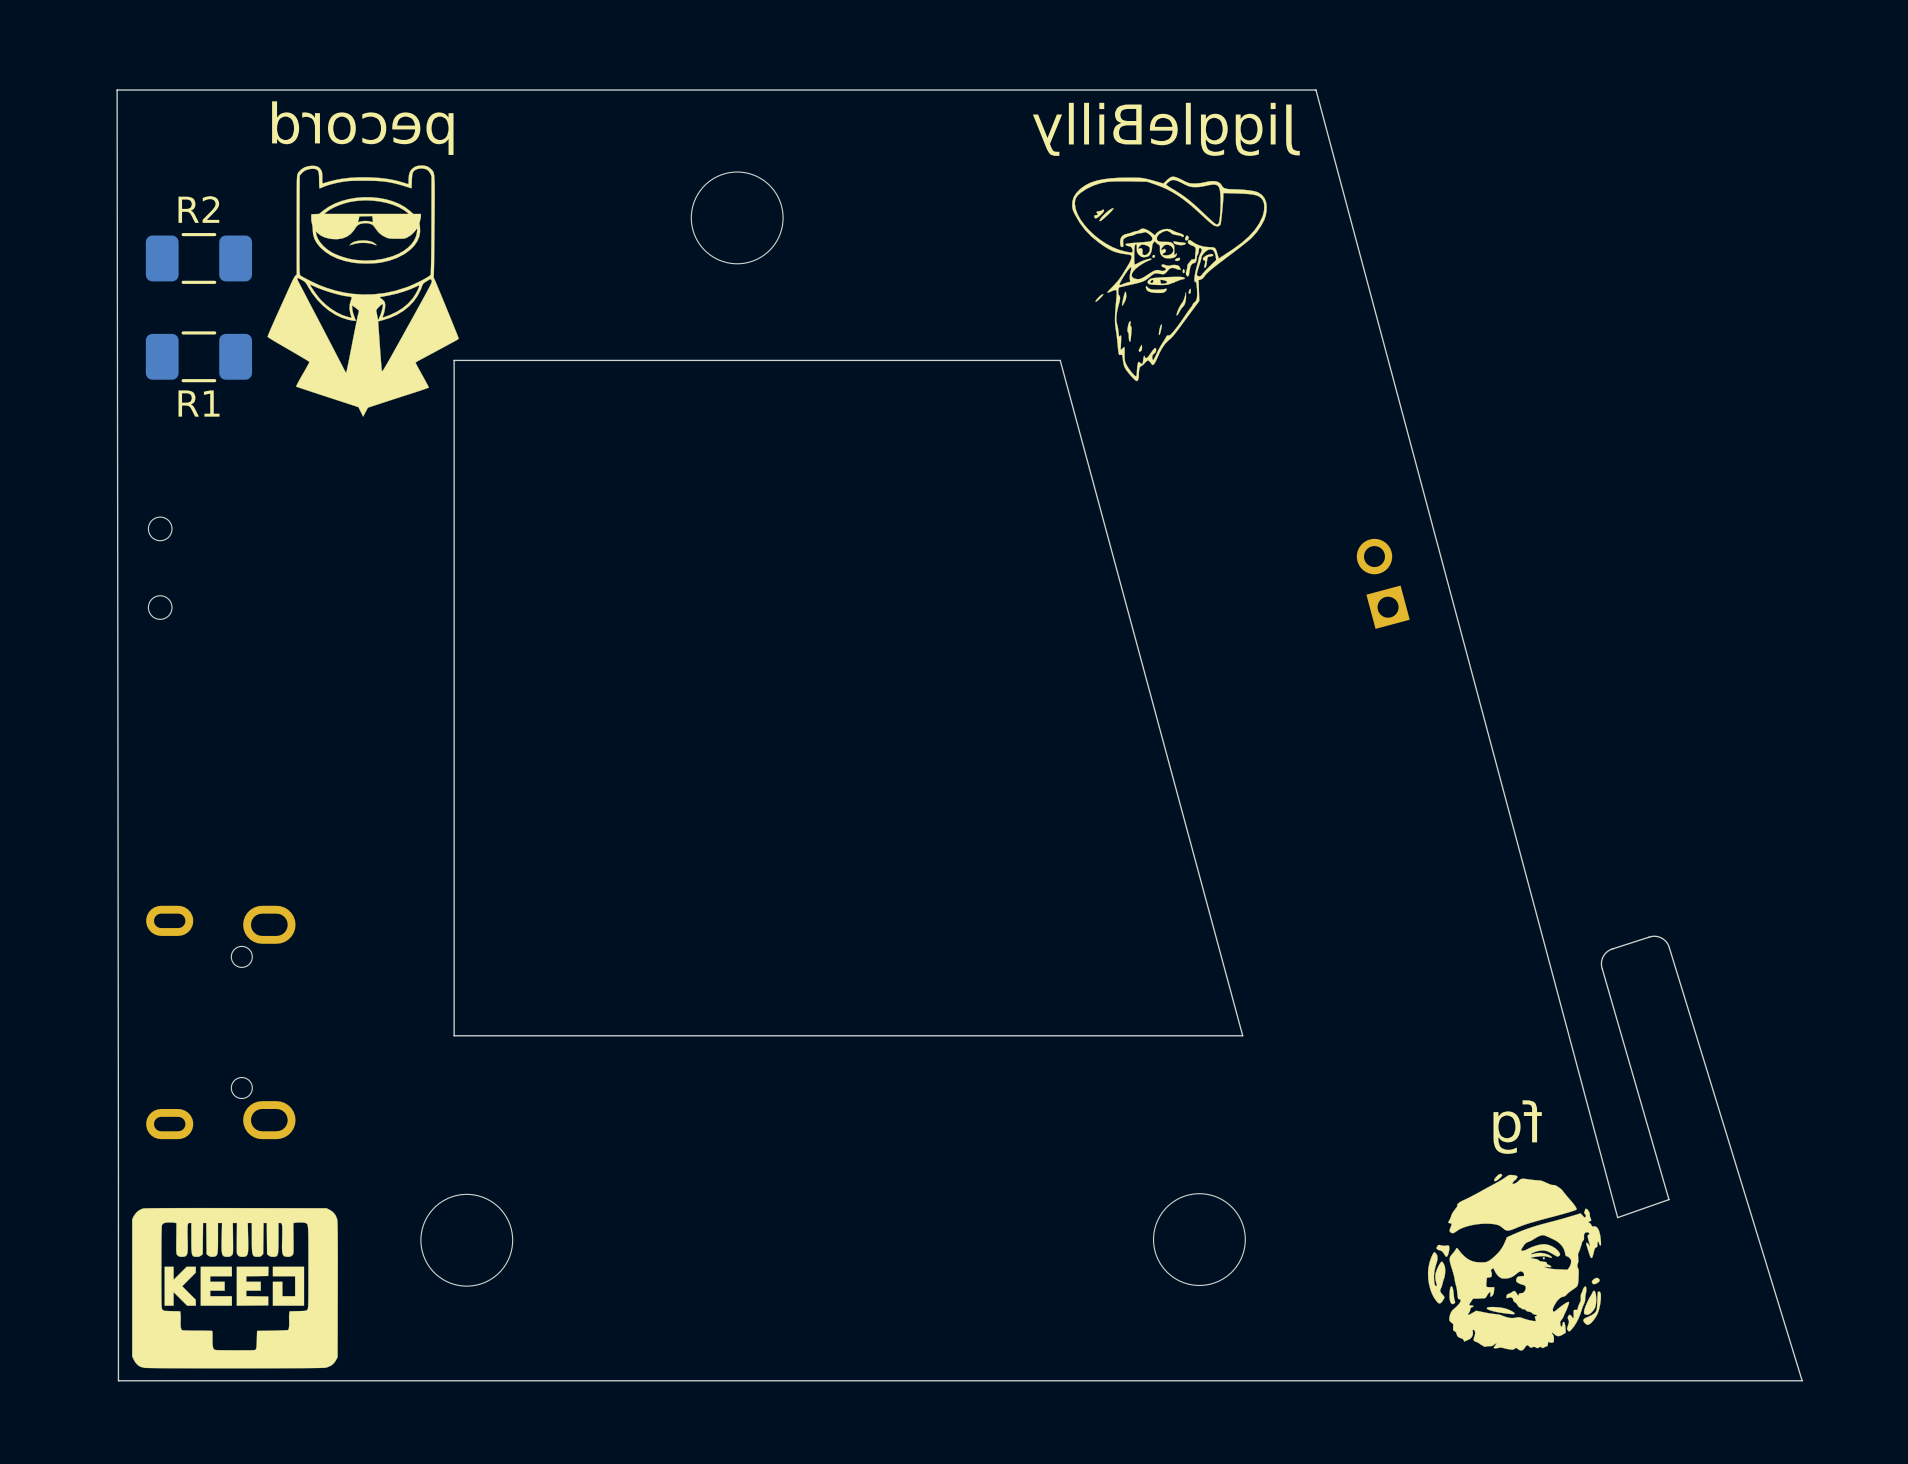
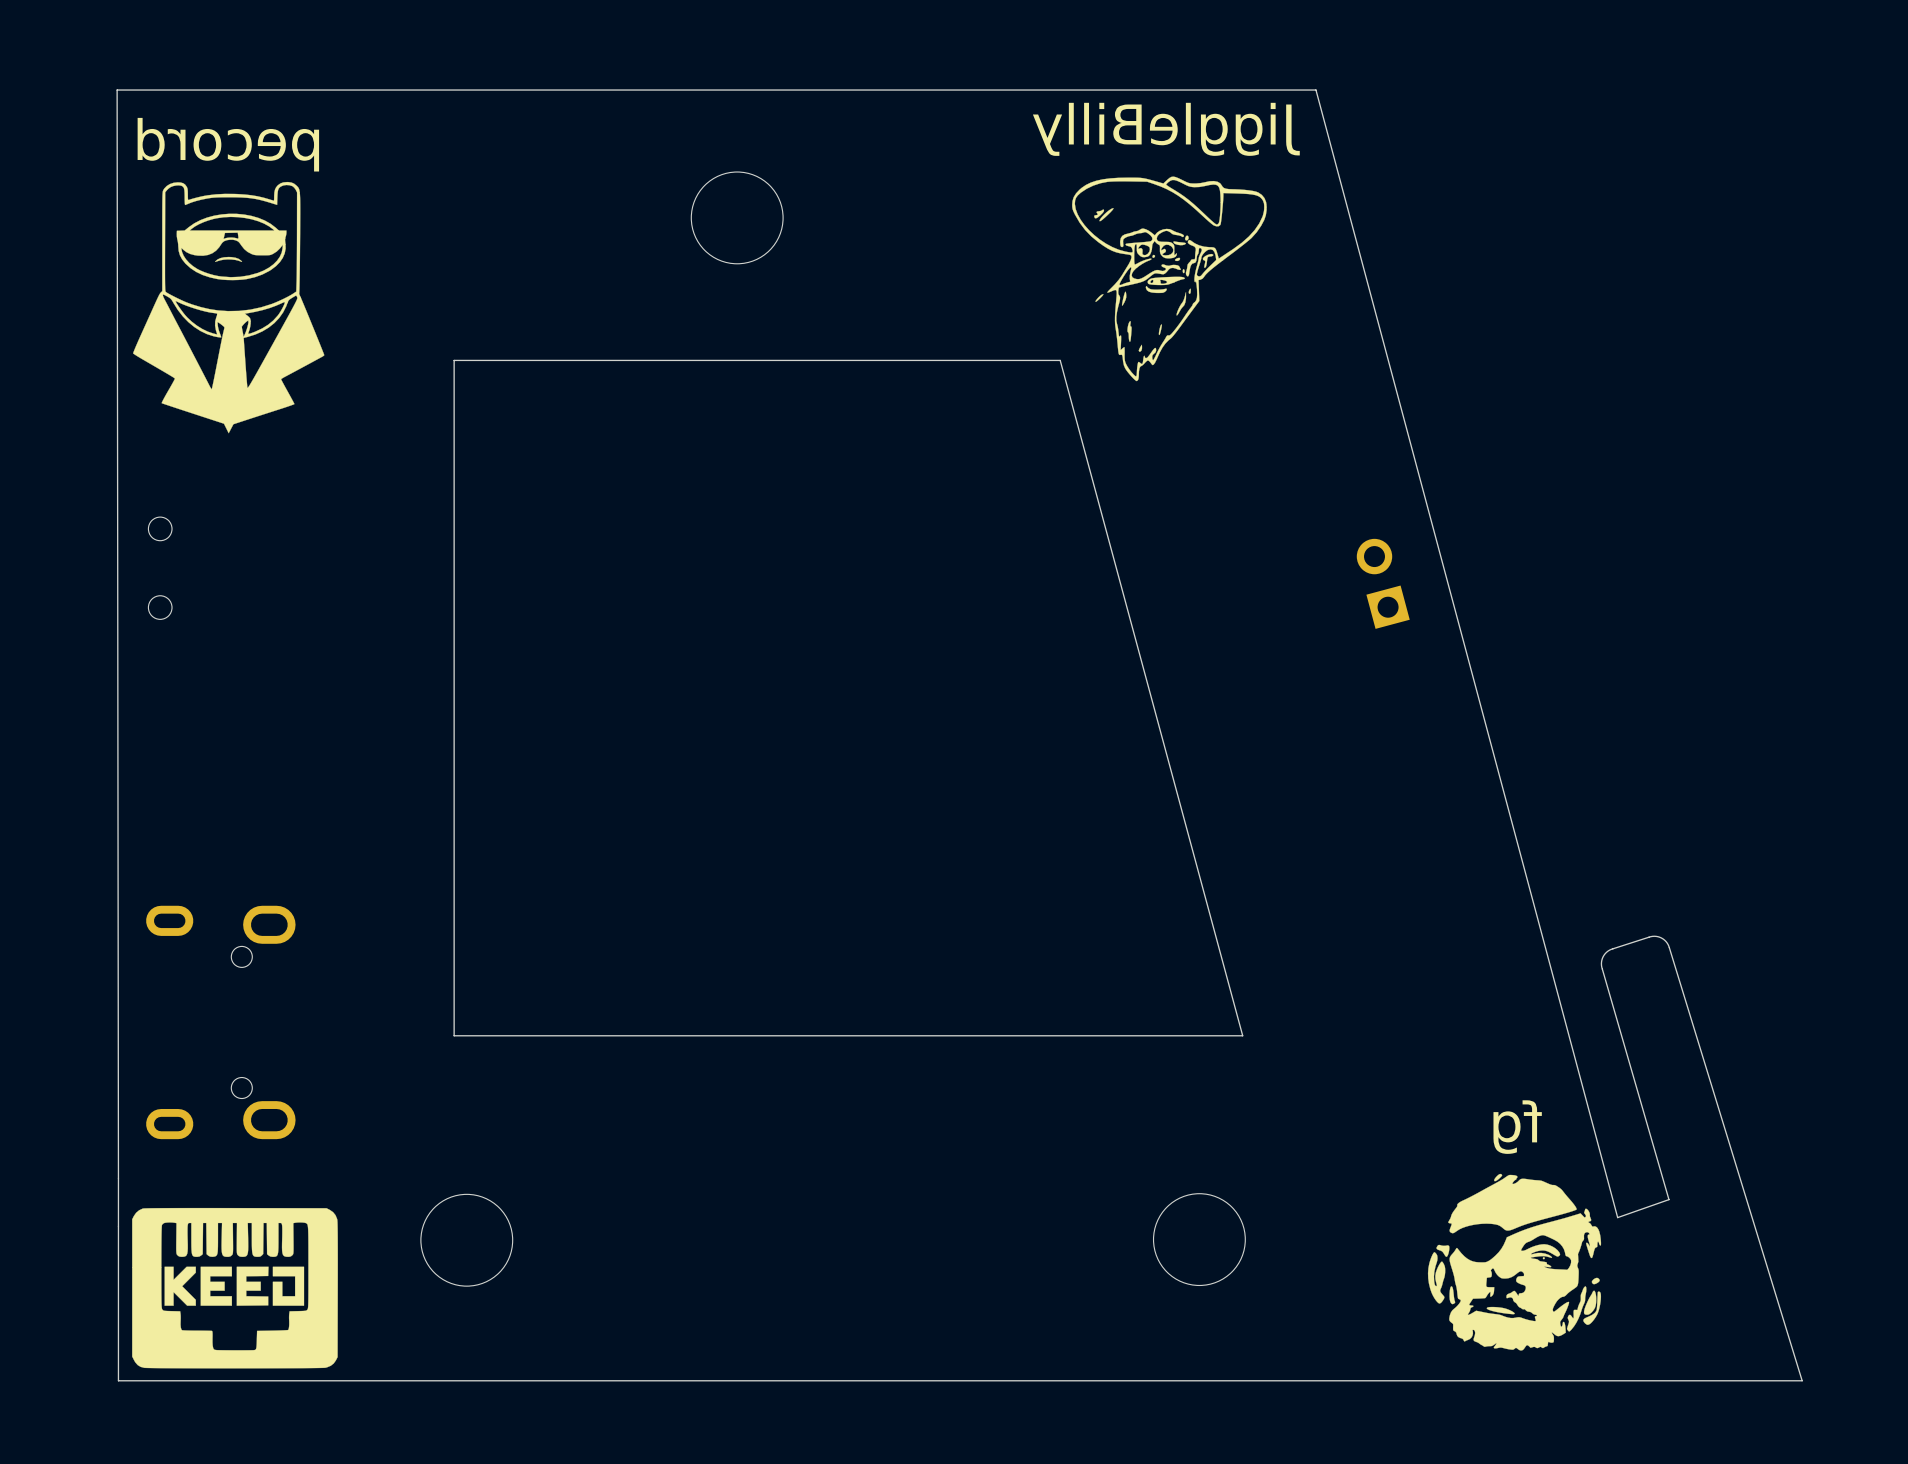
R2: (198, 258) -> none
drawing position: (363, 291) -> (228, 307)
R1: (198, 356) -> none

